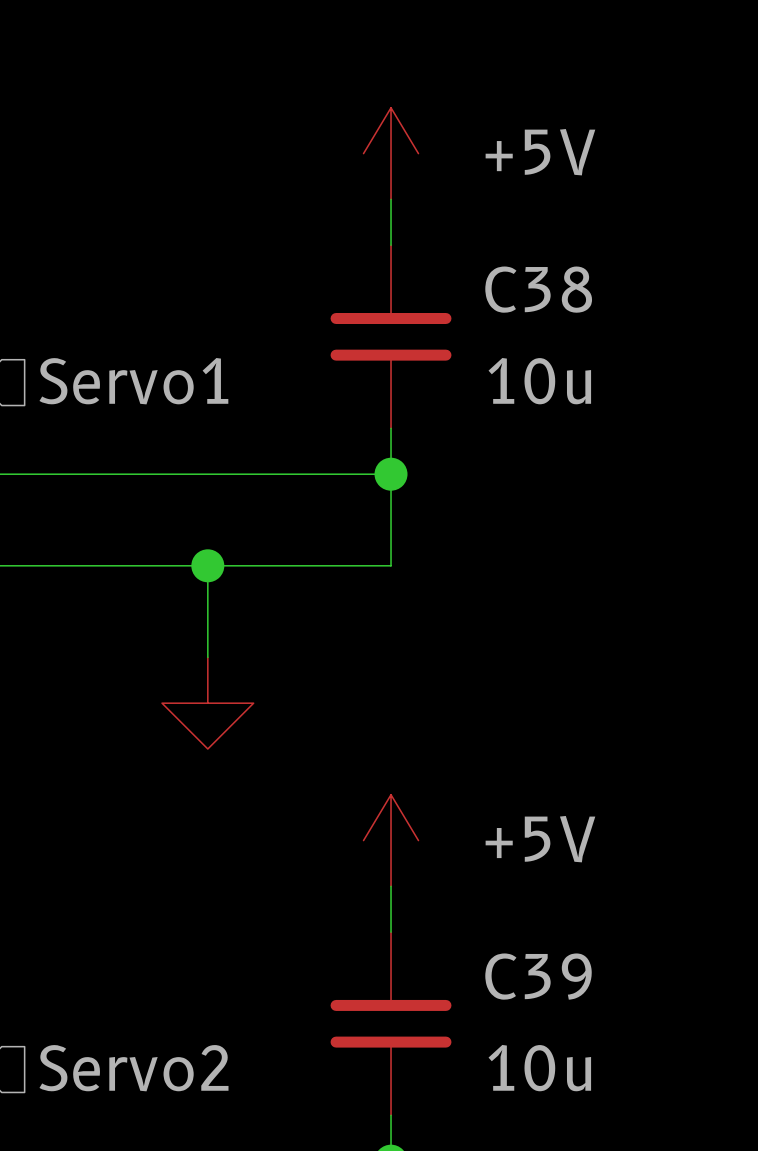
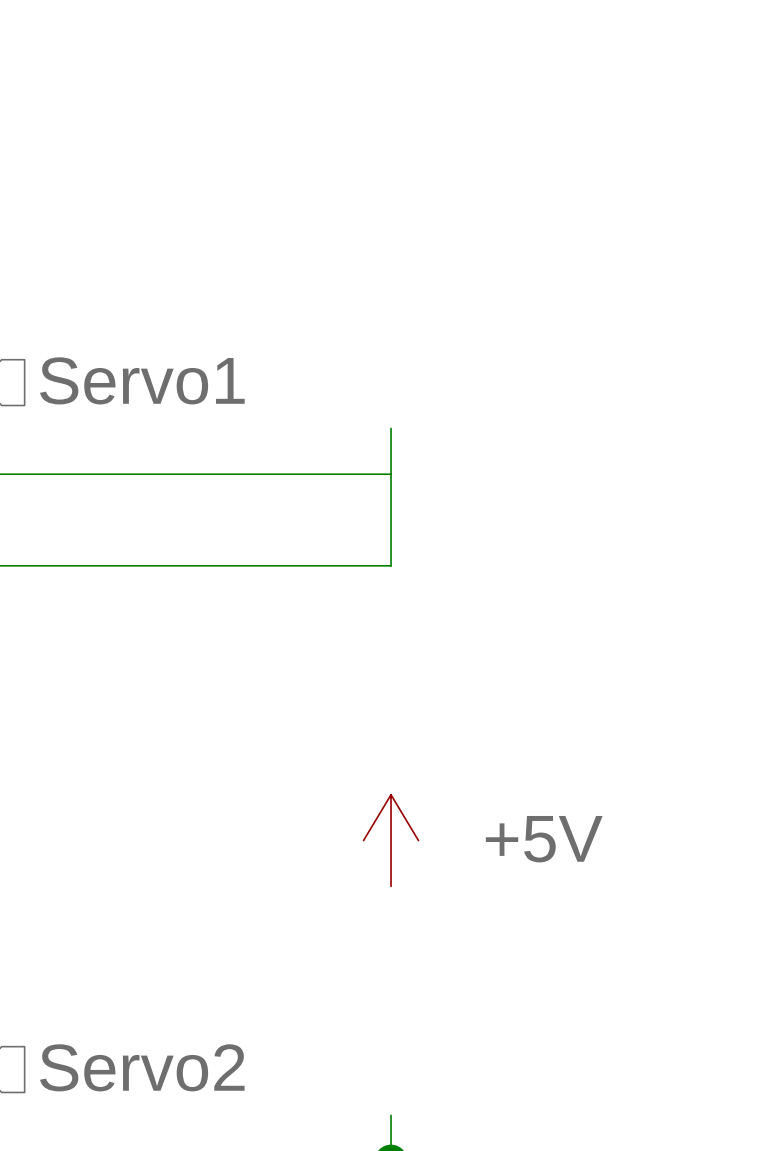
power symbol: +5V (391, 153) -> none
wire: (391, 199) (391, 245) -> none
C38: 10u (391, 336) -> none
junction: (391, 474) -> none
wire: (207, 565) (207, 657) -> none
junction: (207, 565) -> none
power symbol: (207, 703) -> none
wire: (391, 886) (391, 932) -> none
C39: 10u (391, 1023) -> none

